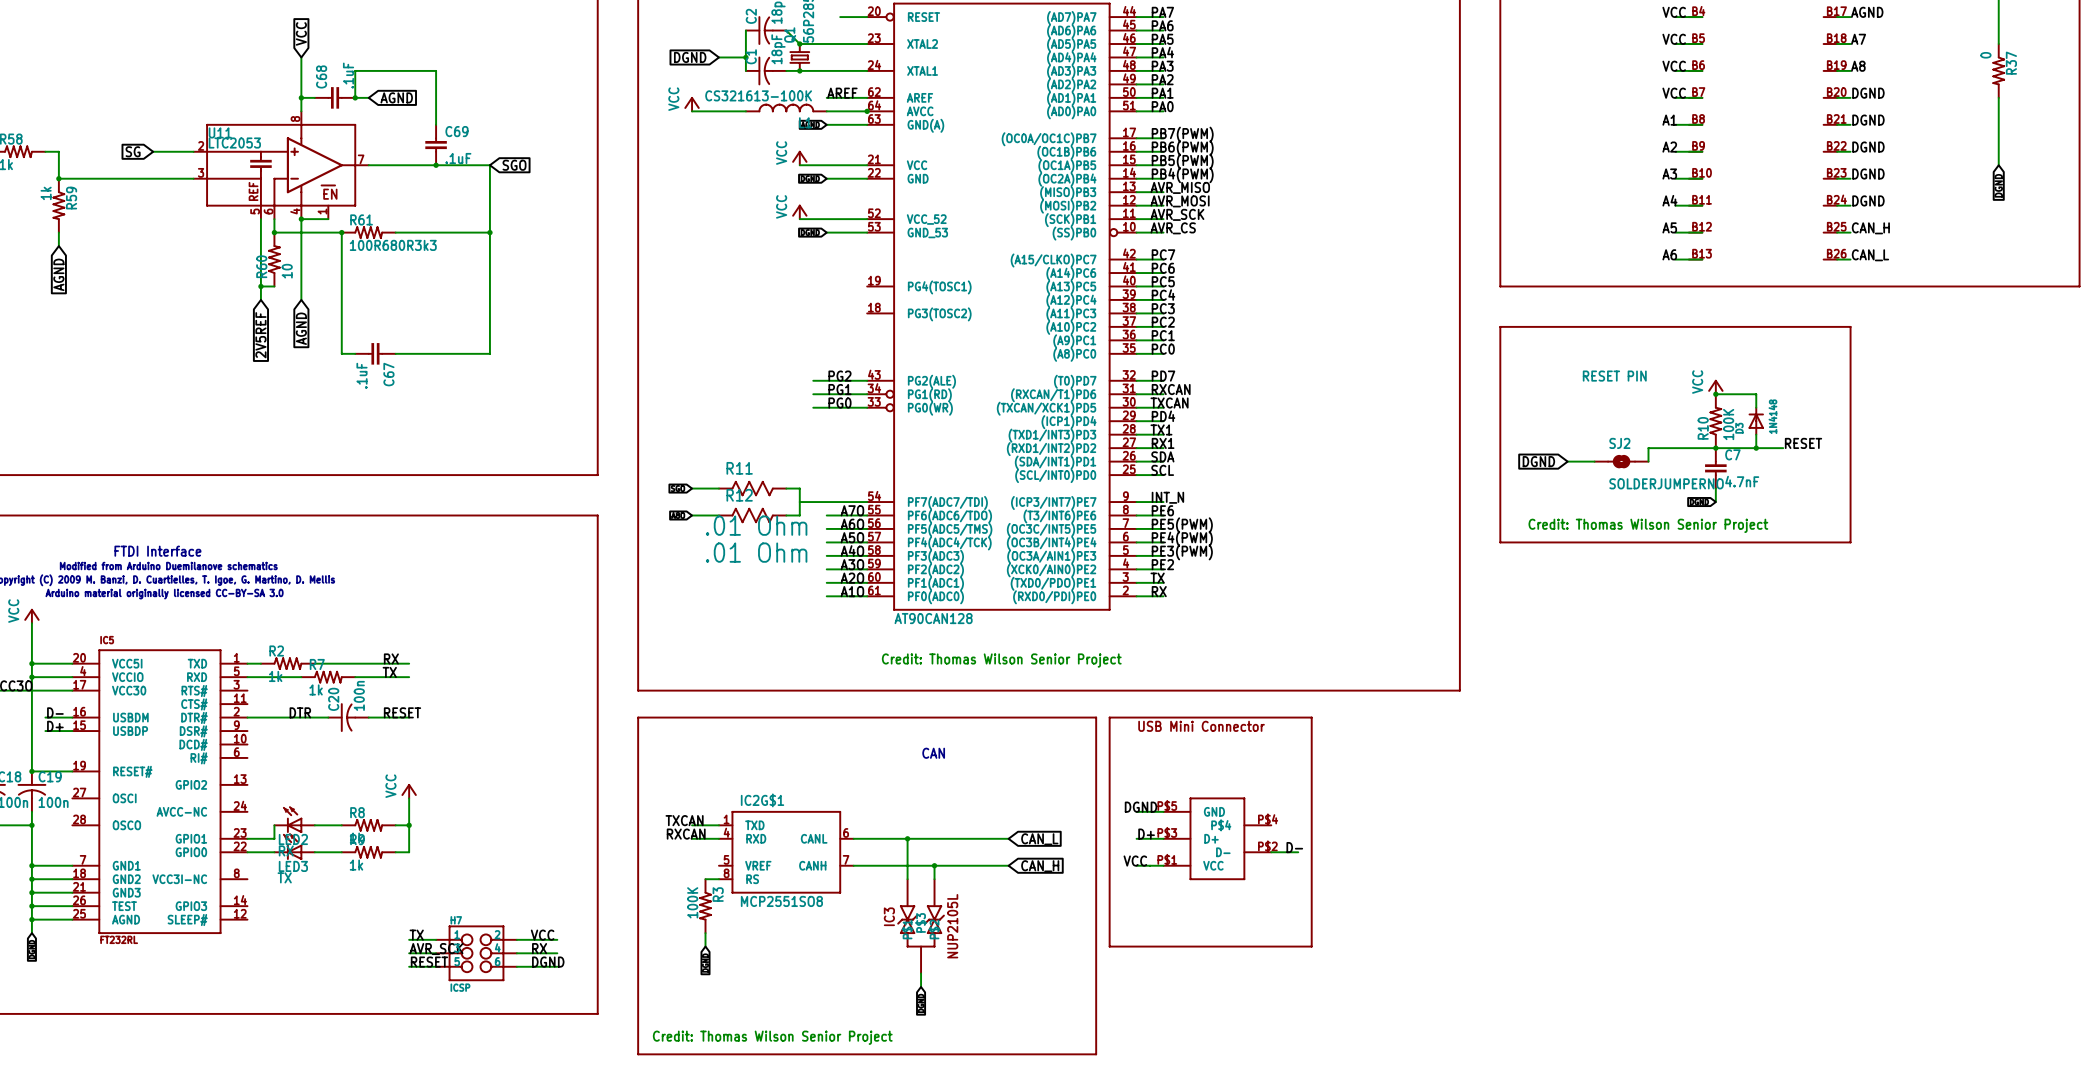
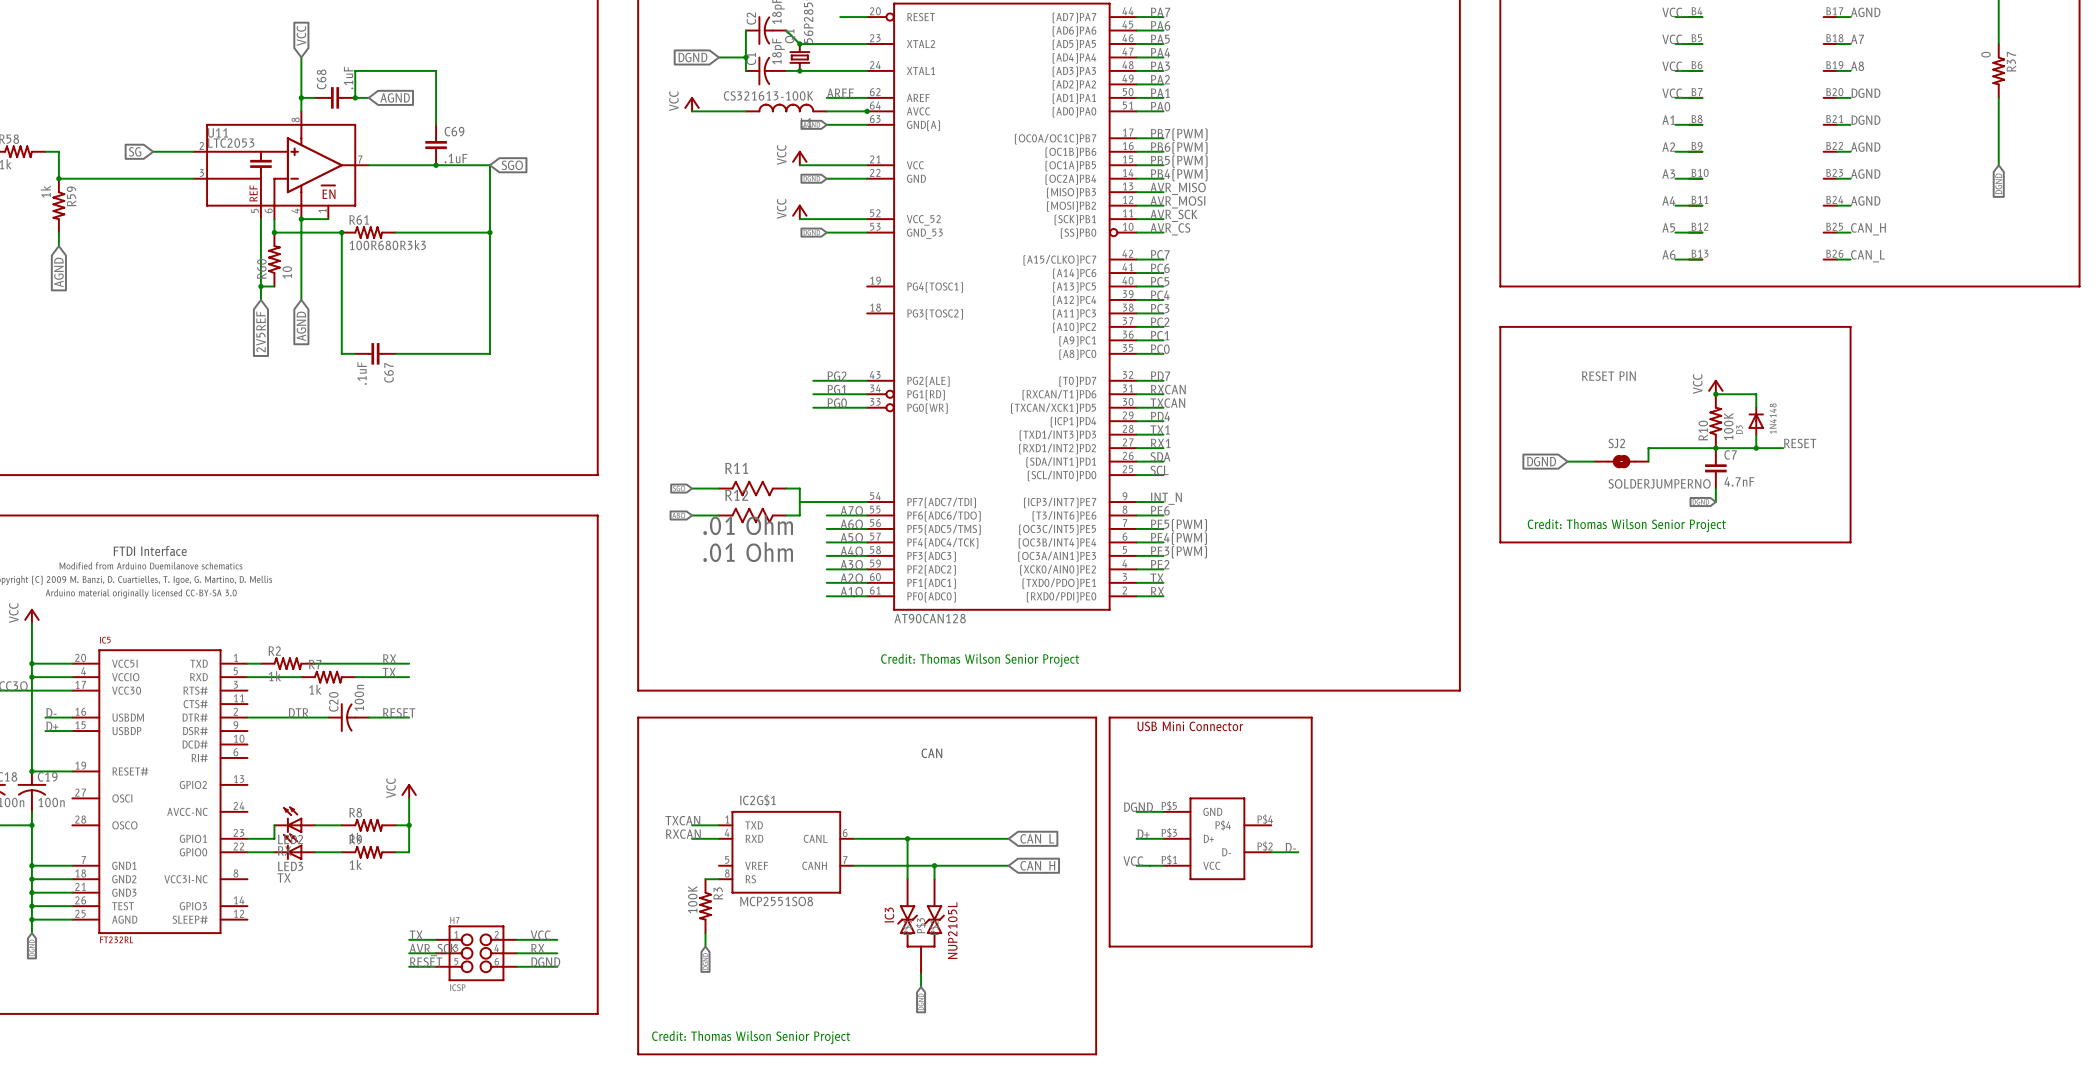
label: DGND (1868, 147) -> AGND (1865, 147)
label: DGND (1868, 174) -> AGND (1865, 174)
label: DGND (1868, 200) -> AGND (1865, 200)

